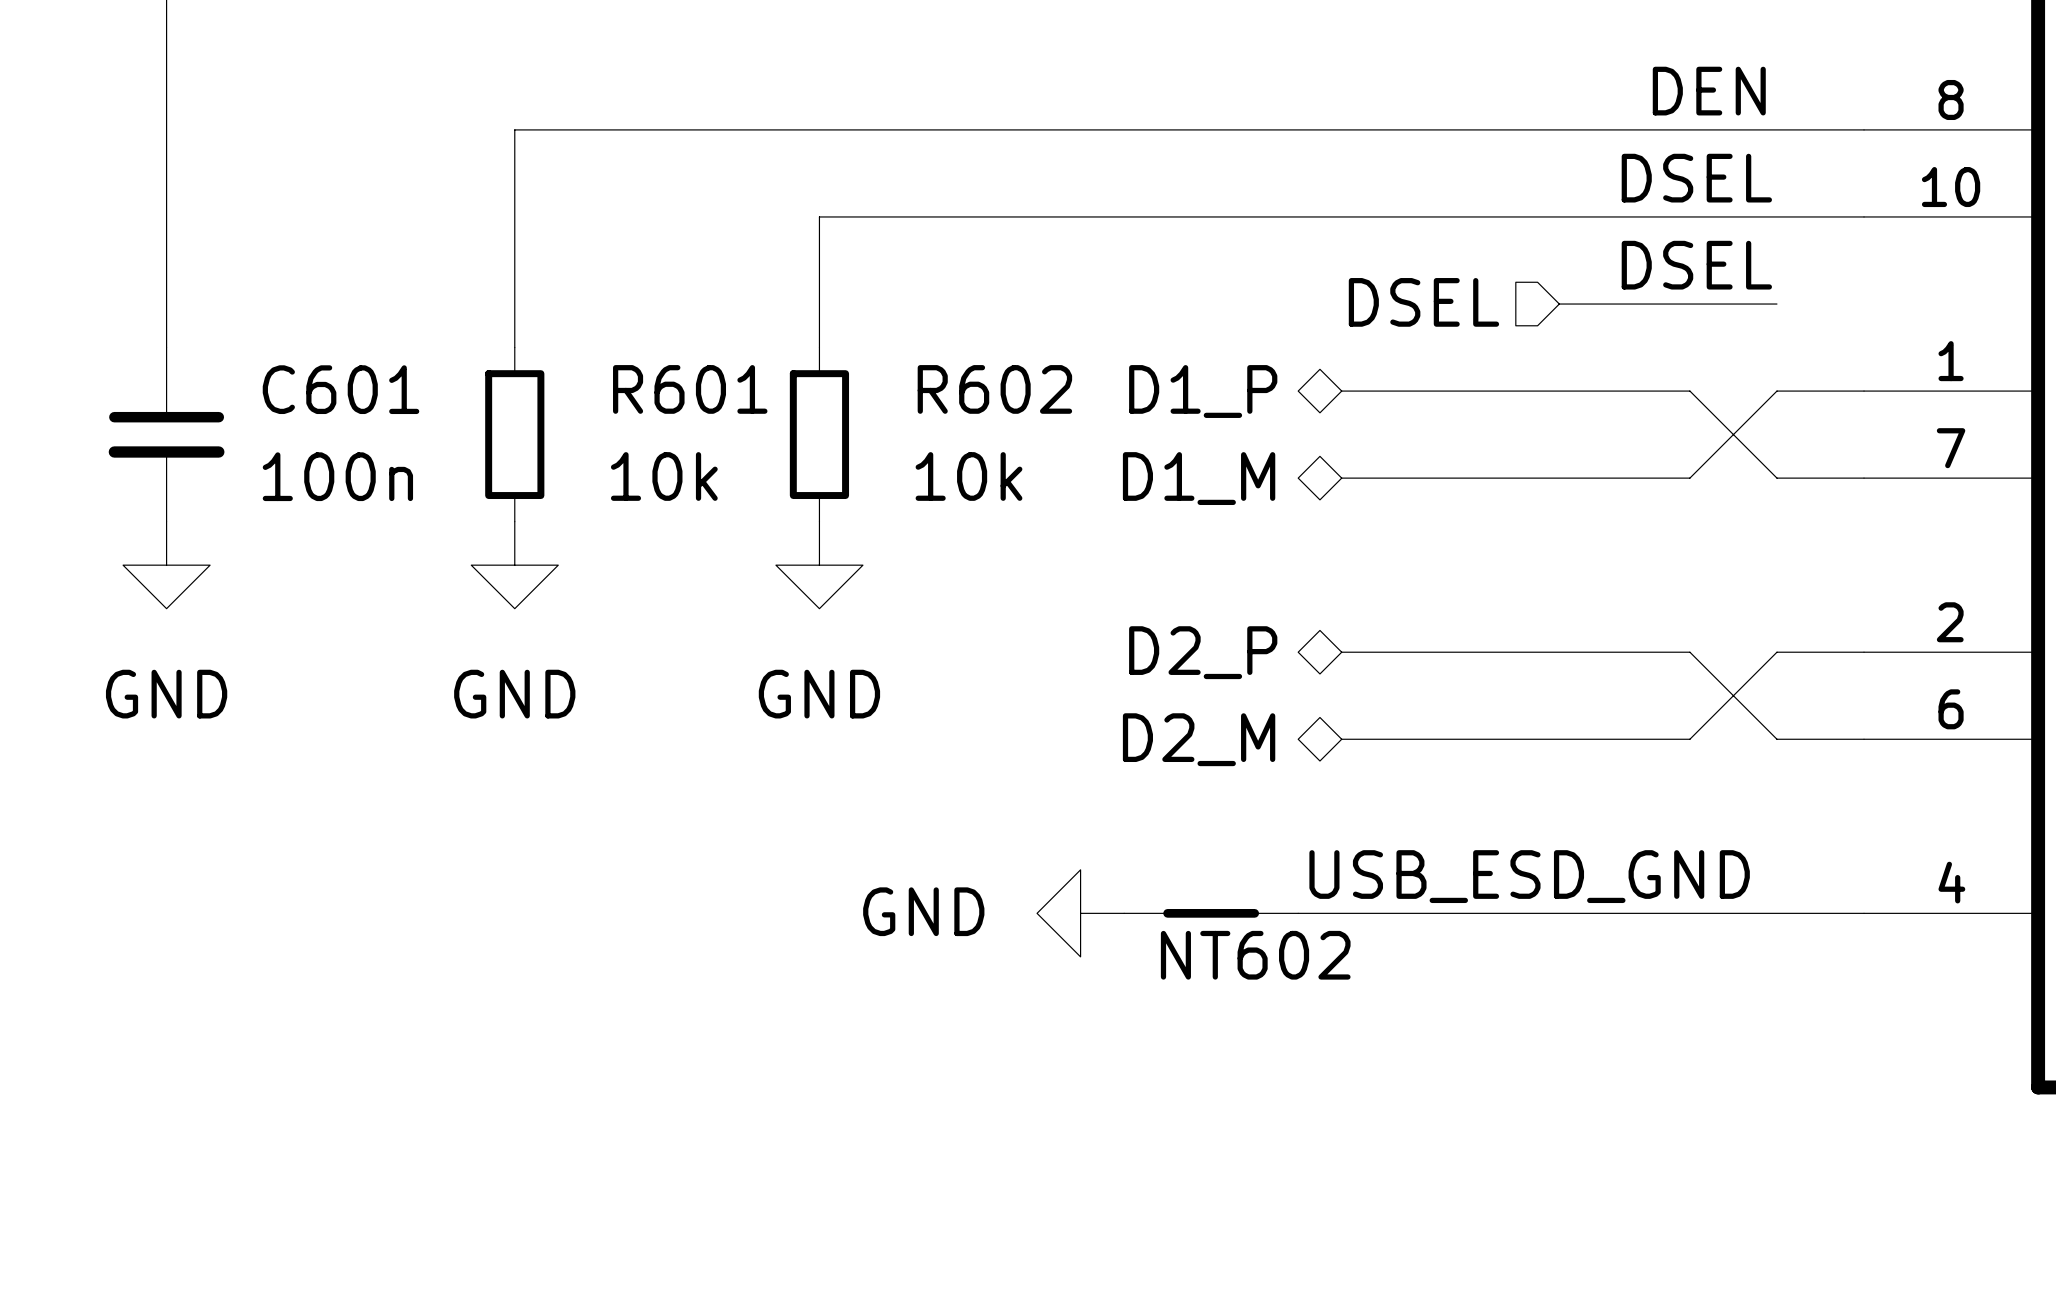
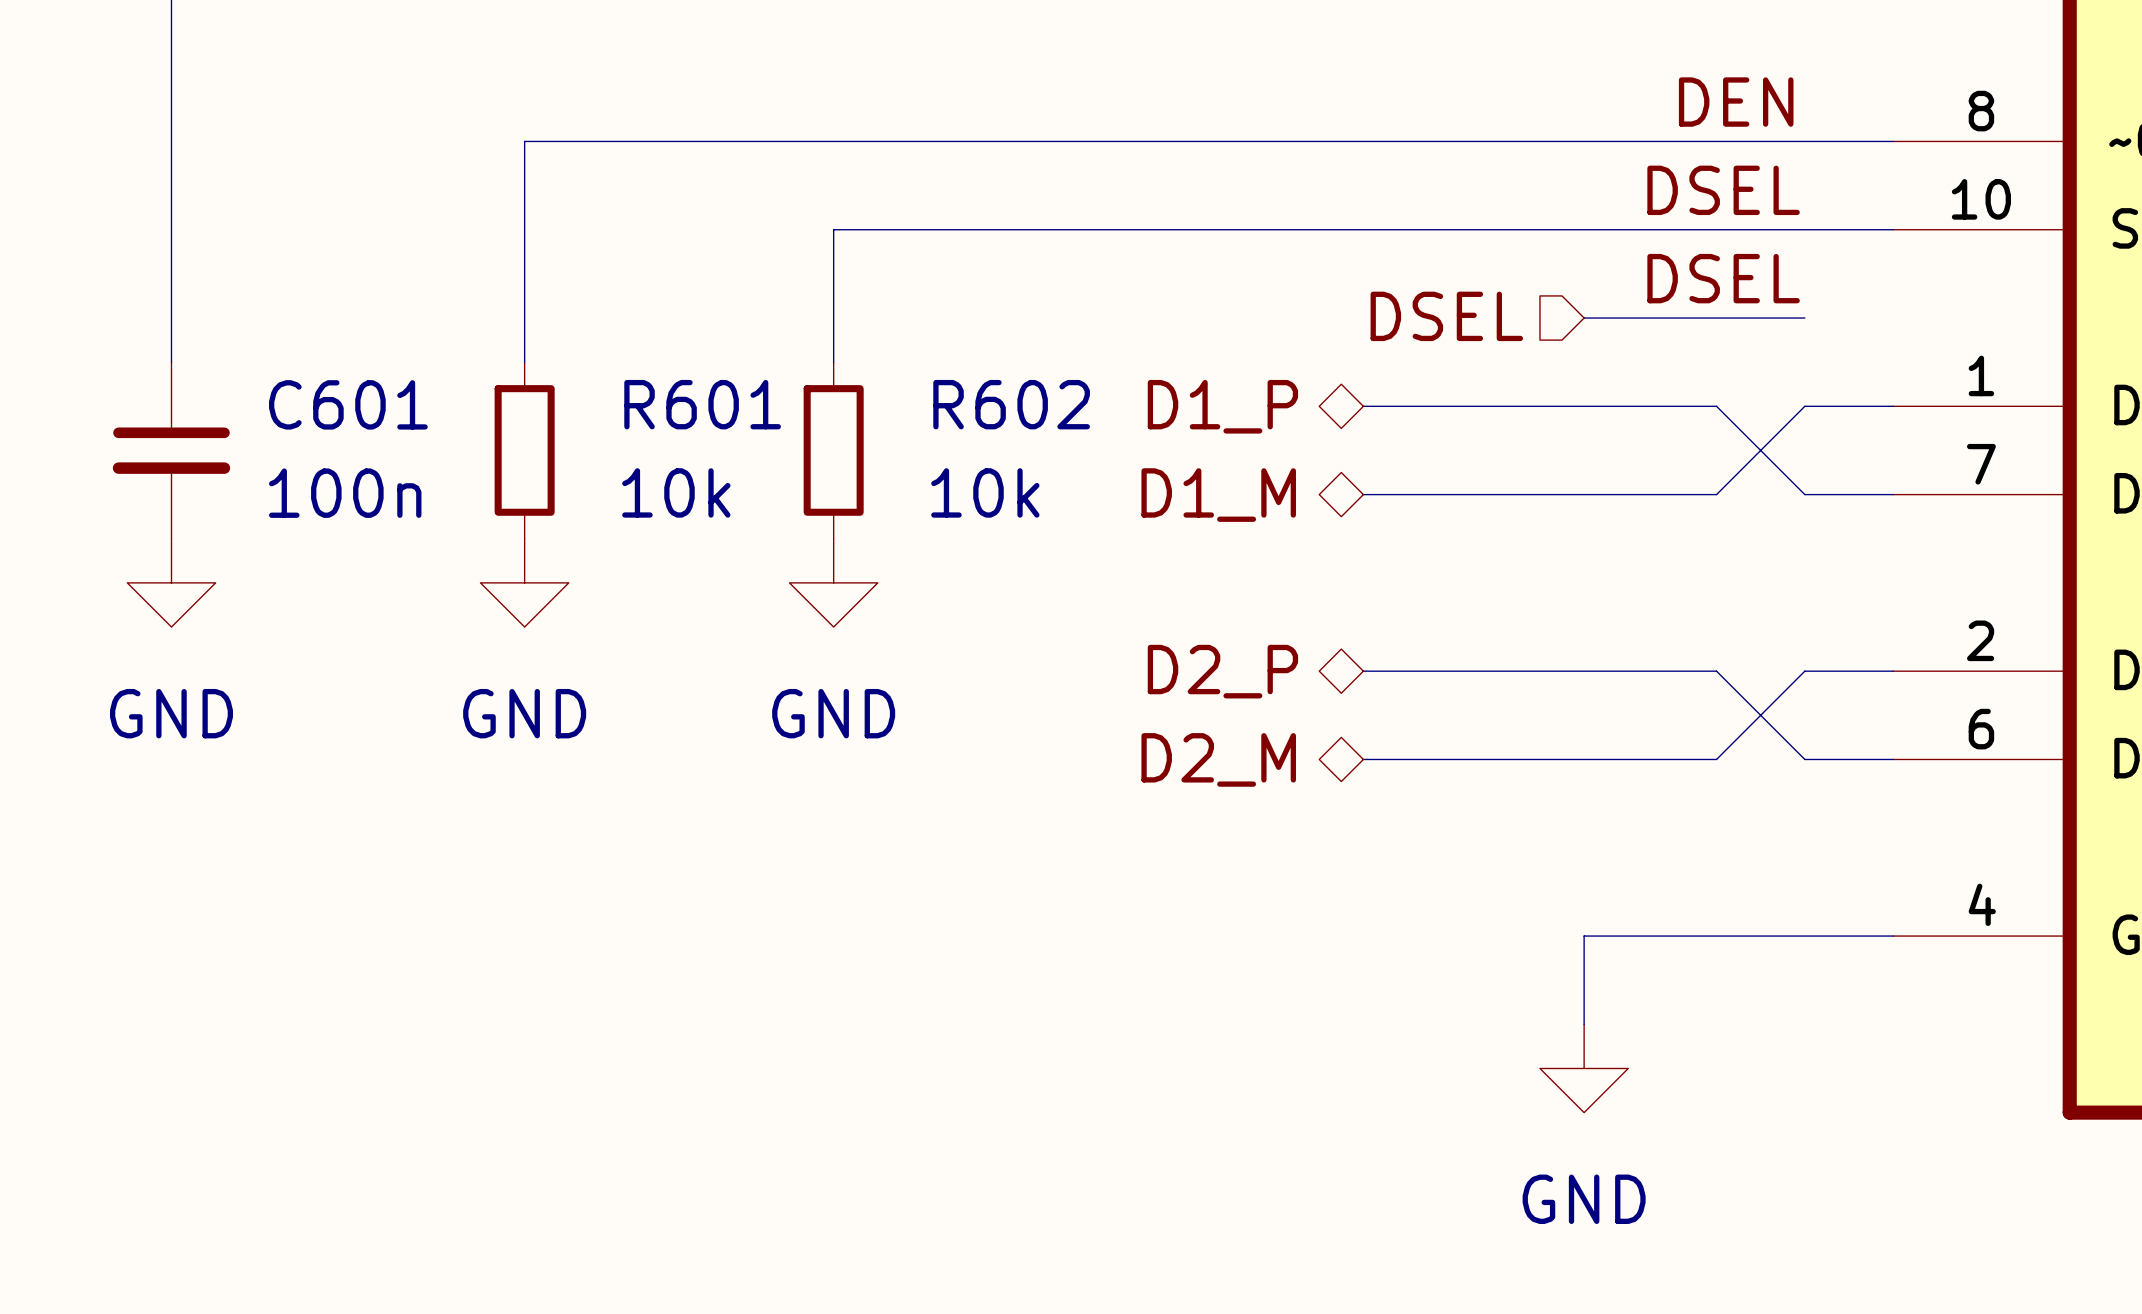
label: USB_ESD_GND (1529, 876) -> none
power symbol rotation: 0° (1080, 913) -> 90° counterclockwise (1584, 1068)
power symbol position: GND (1080, 913) -> GND (1584, 1068)
NT602: (1211, 913) -> none
wire: (1298, 913) (1559, 913) -> (1584, 1024) (1584, 936)

